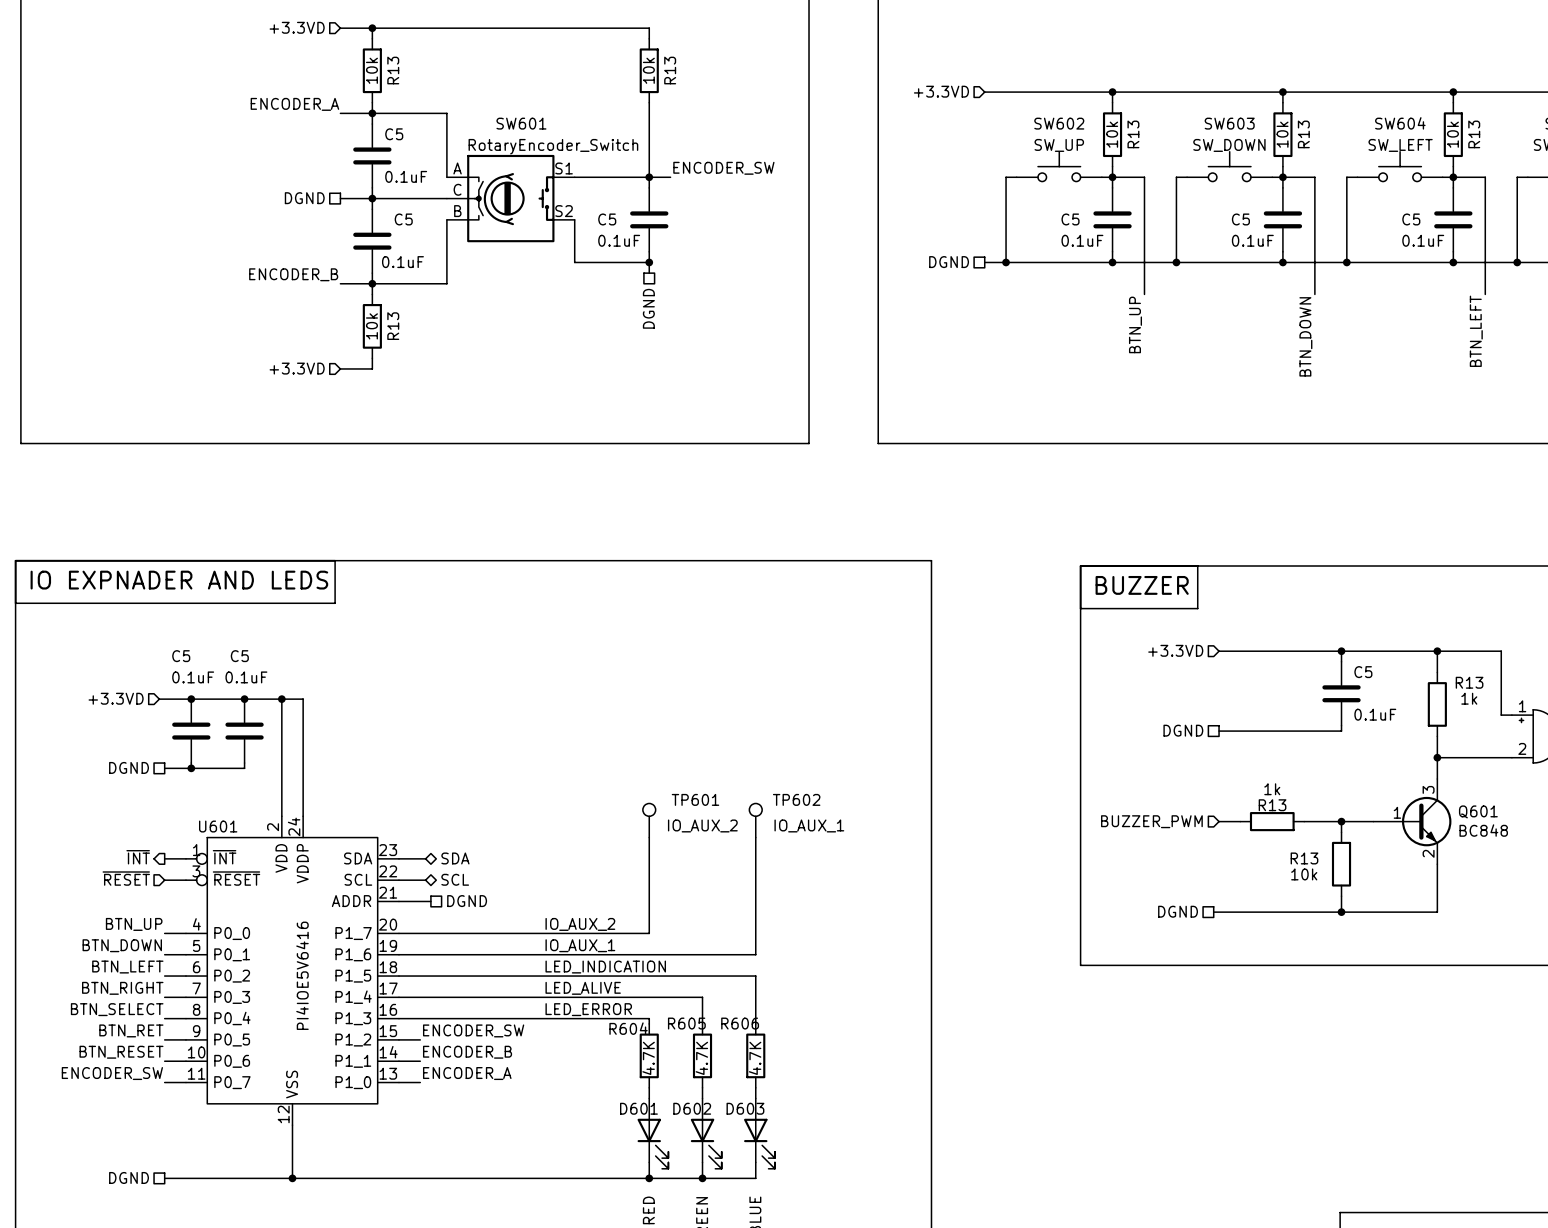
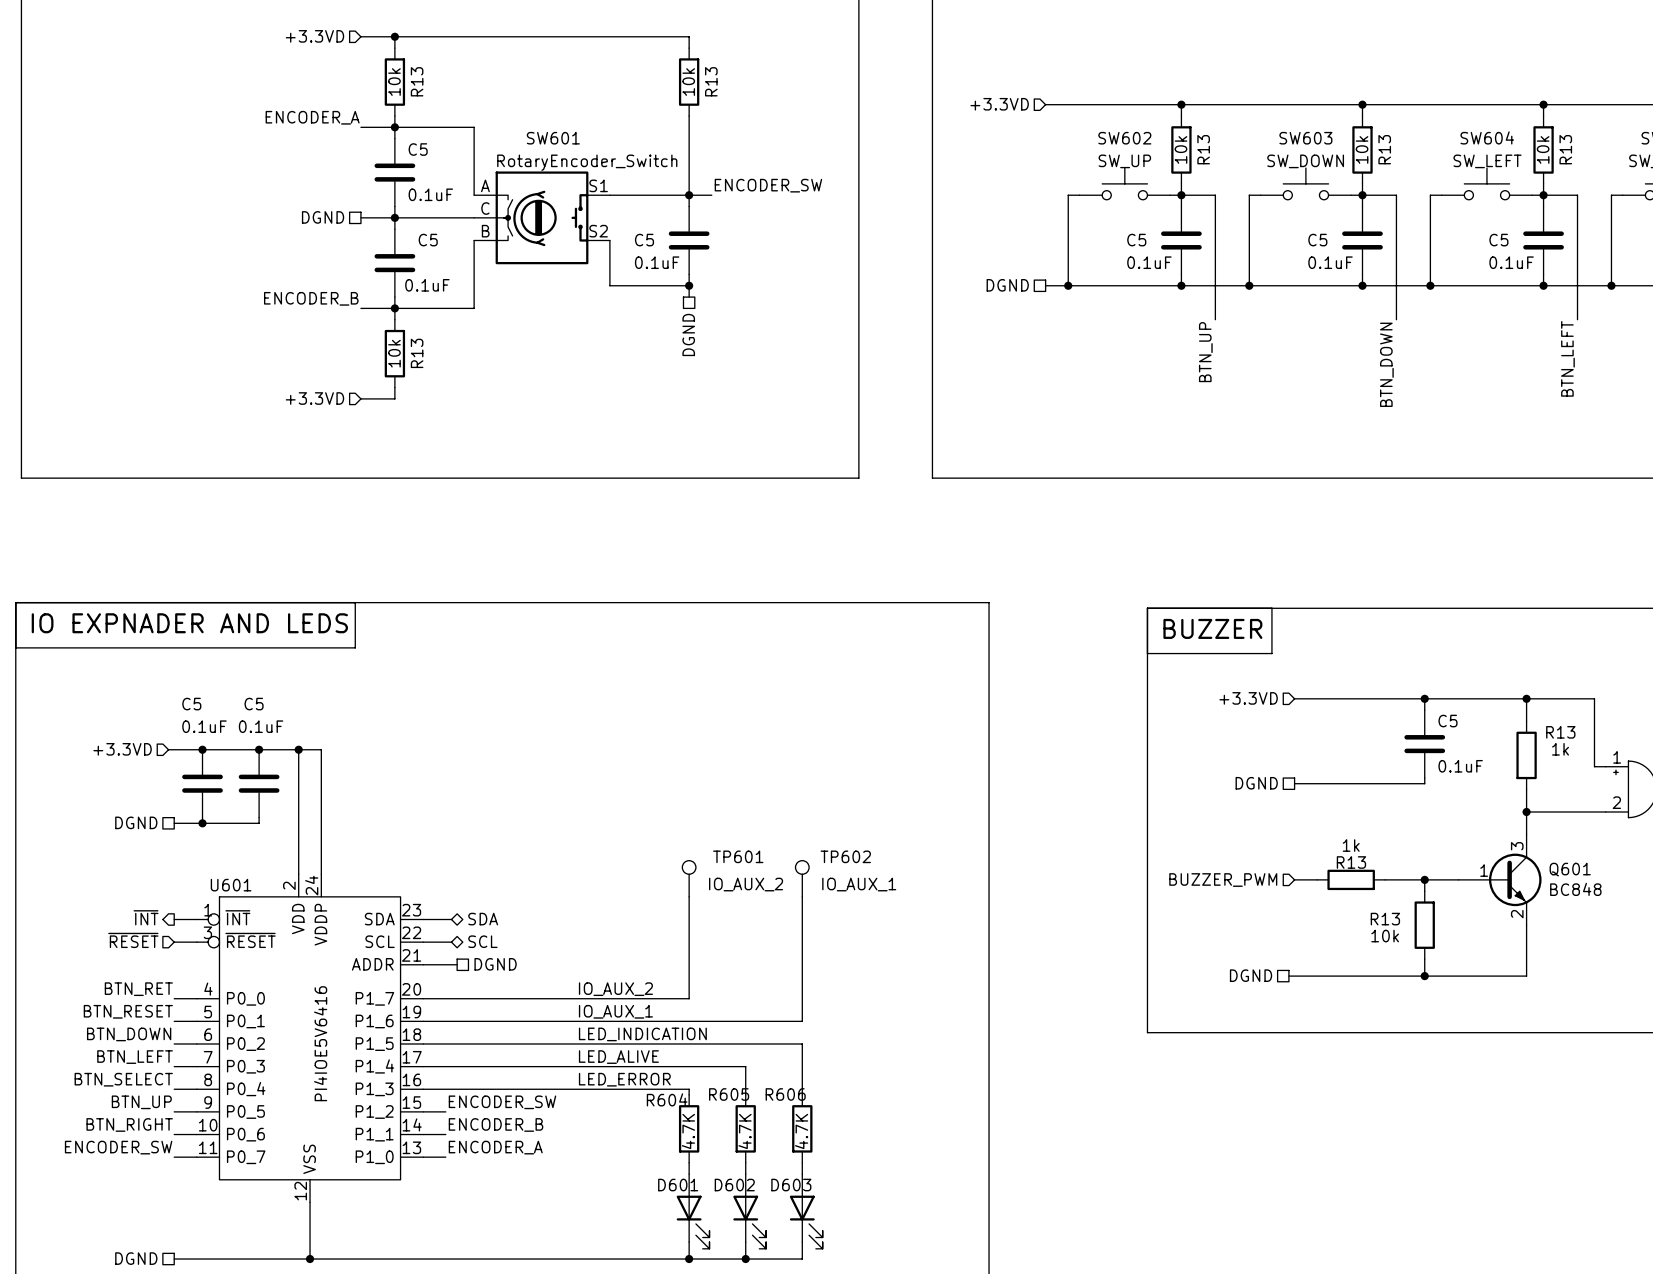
label: BTN_UP (134, 924) -> BTN_RET (138, 989)
label: BTN_DOWN (122, 945) -> BTN_RESET (128, 1011)
label: BTN_LEFT (127, 967) -> BTN_DOWN (129, 1034)
label: BTN_RIGHT (122, 988) -> BTN_LEFT (135, 1057)
label: BTN_RET (131, 1030) -> BTN_UP (141, 1102)
label: BTN_RESET (121, 1052) -> BTN_RIGHT (129, 1124)

